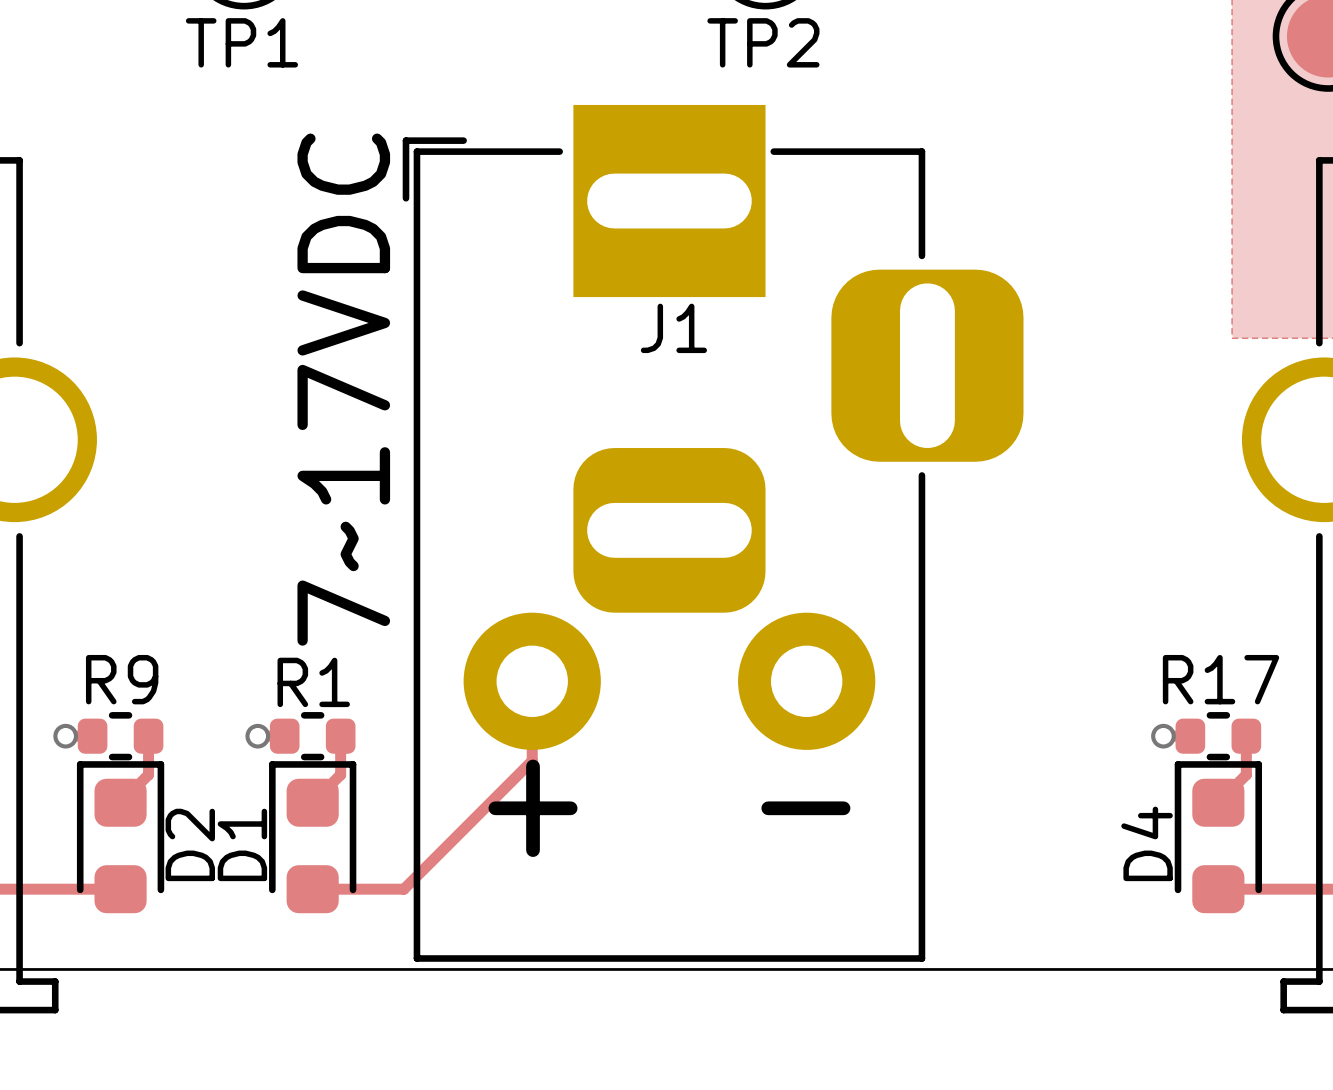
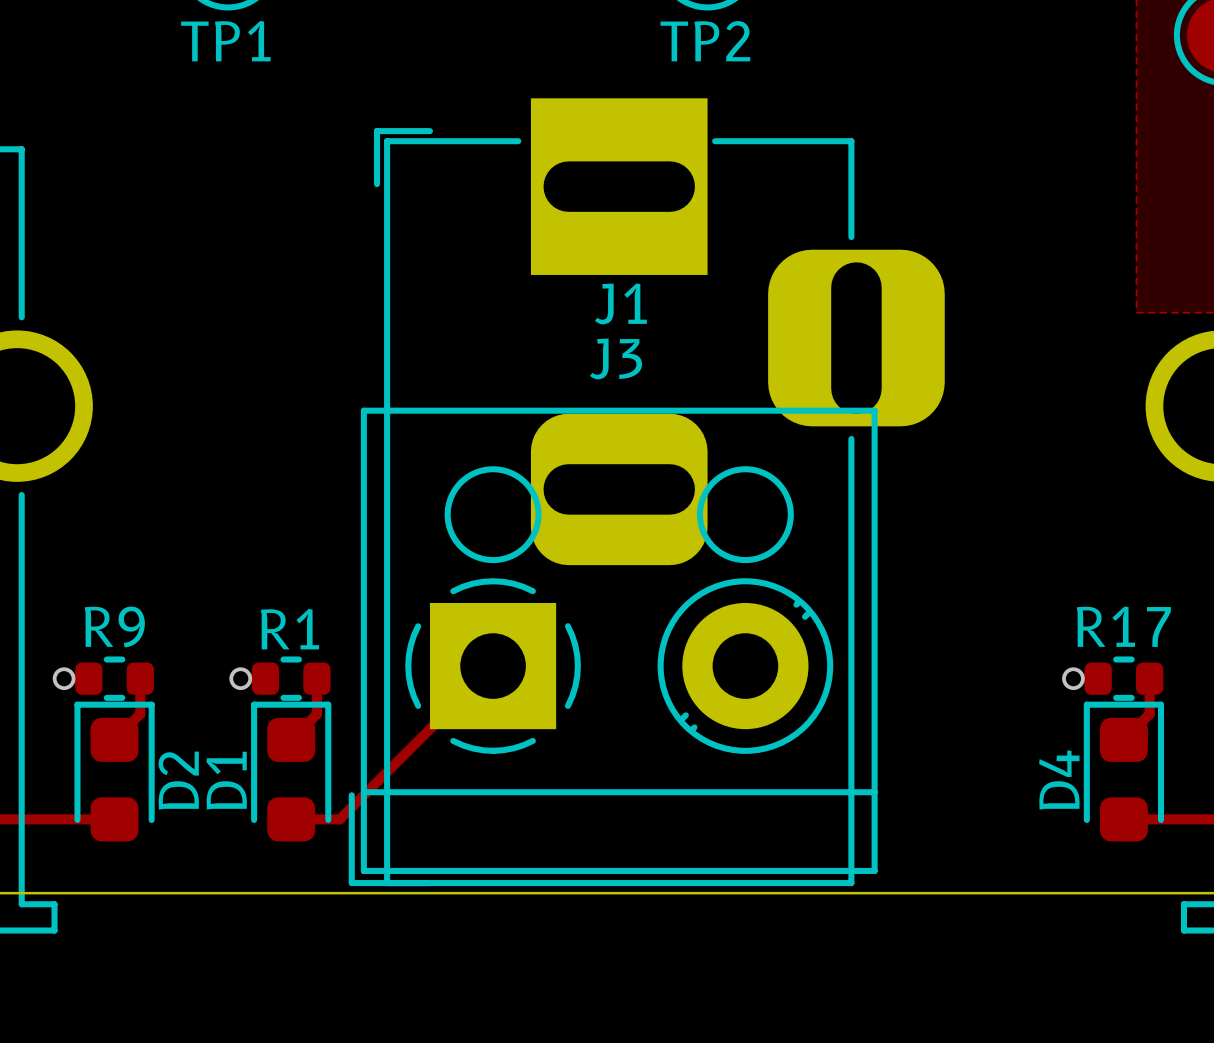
J1 footprint: [402, 104, 1024, 962] -> [373, 98, 945, 887]
text: 7~17VDC (343, 389) -> none
track: (532, 681) (532, 760) (403, 889) (365, 889) -> (493, 666) (339, 819)
J3: none -> (613, 646)
text: + - (669, 808) -> none

